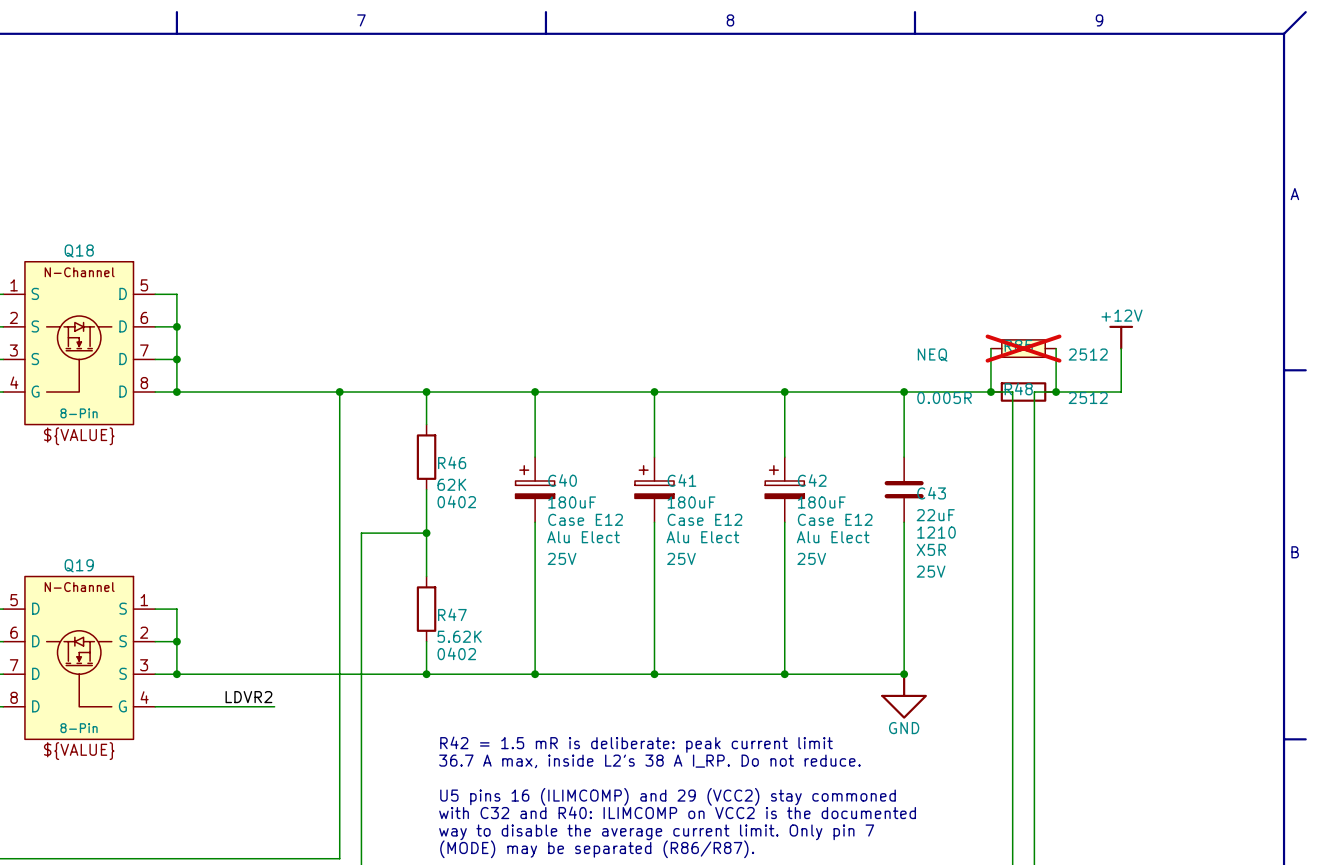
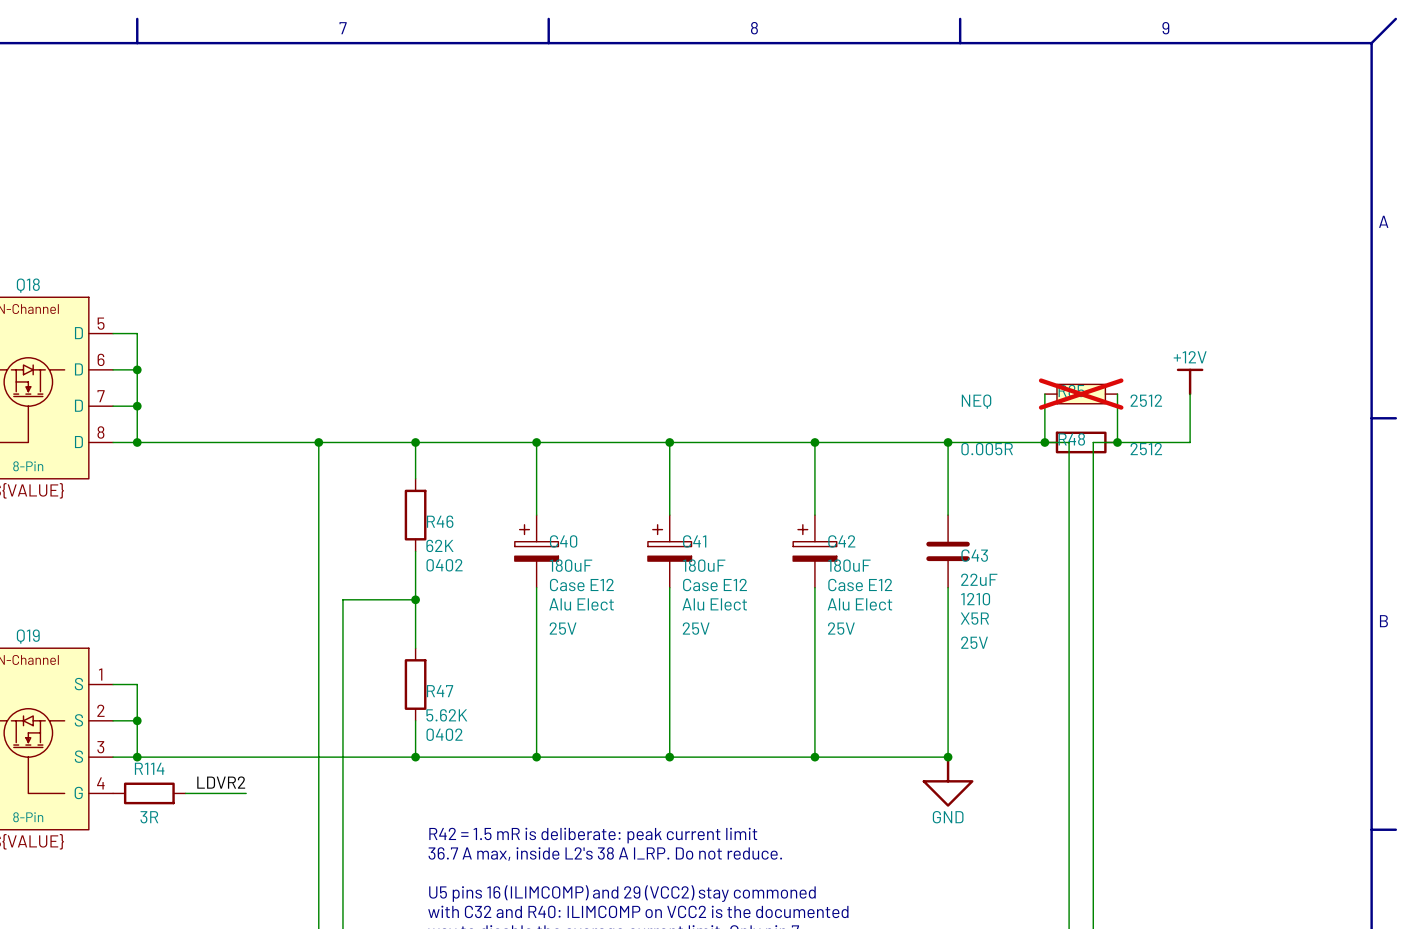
wire: (155, 706) (220, 706) -> none
R114: none -> 3R (149, 793)

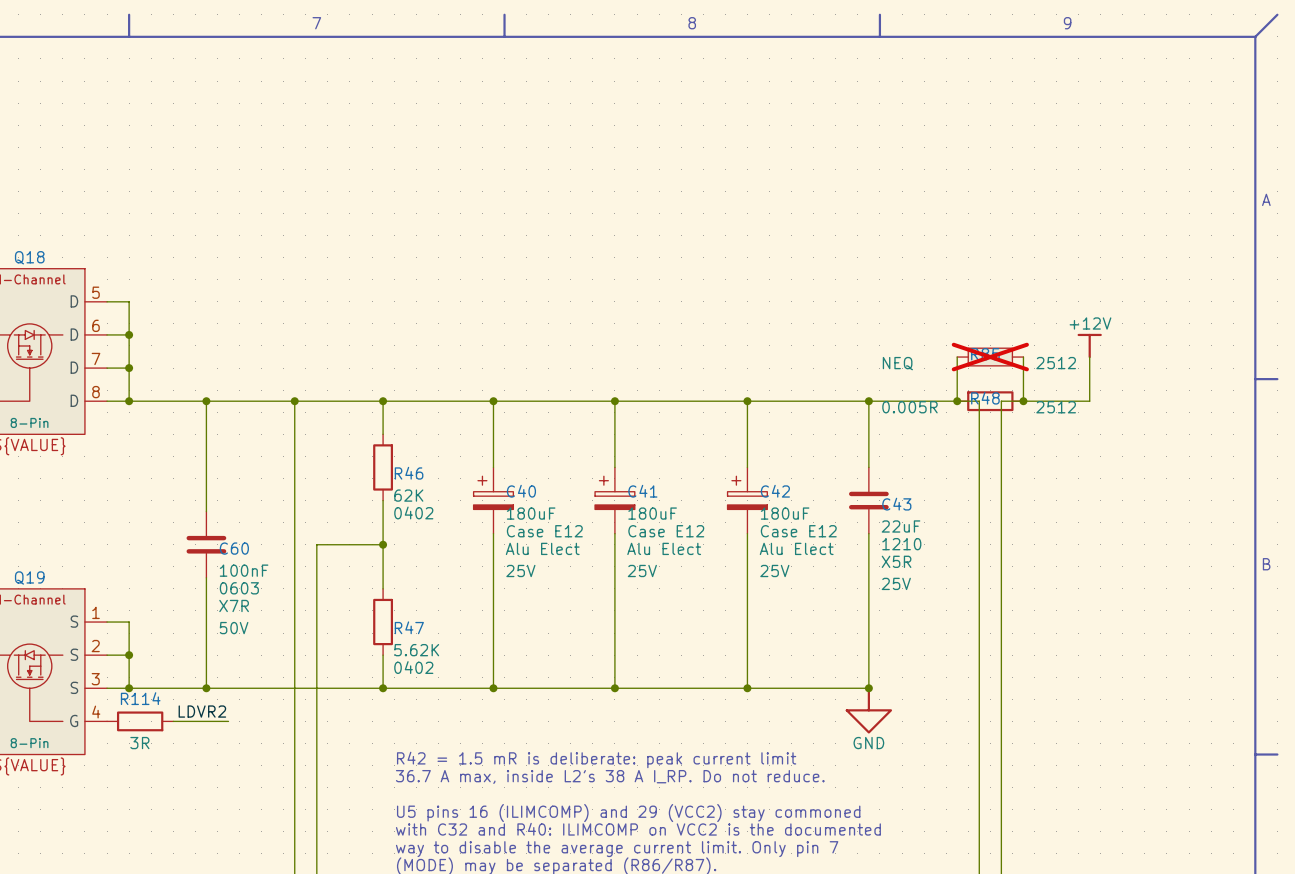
wire: none -> (206, 401) (206, 511)
junction: none -> (206, 401)
C60: none -> 100nF (206, 544)
wire: none -> (206, 577) (206, 688)
junction: none -> (206, 688)

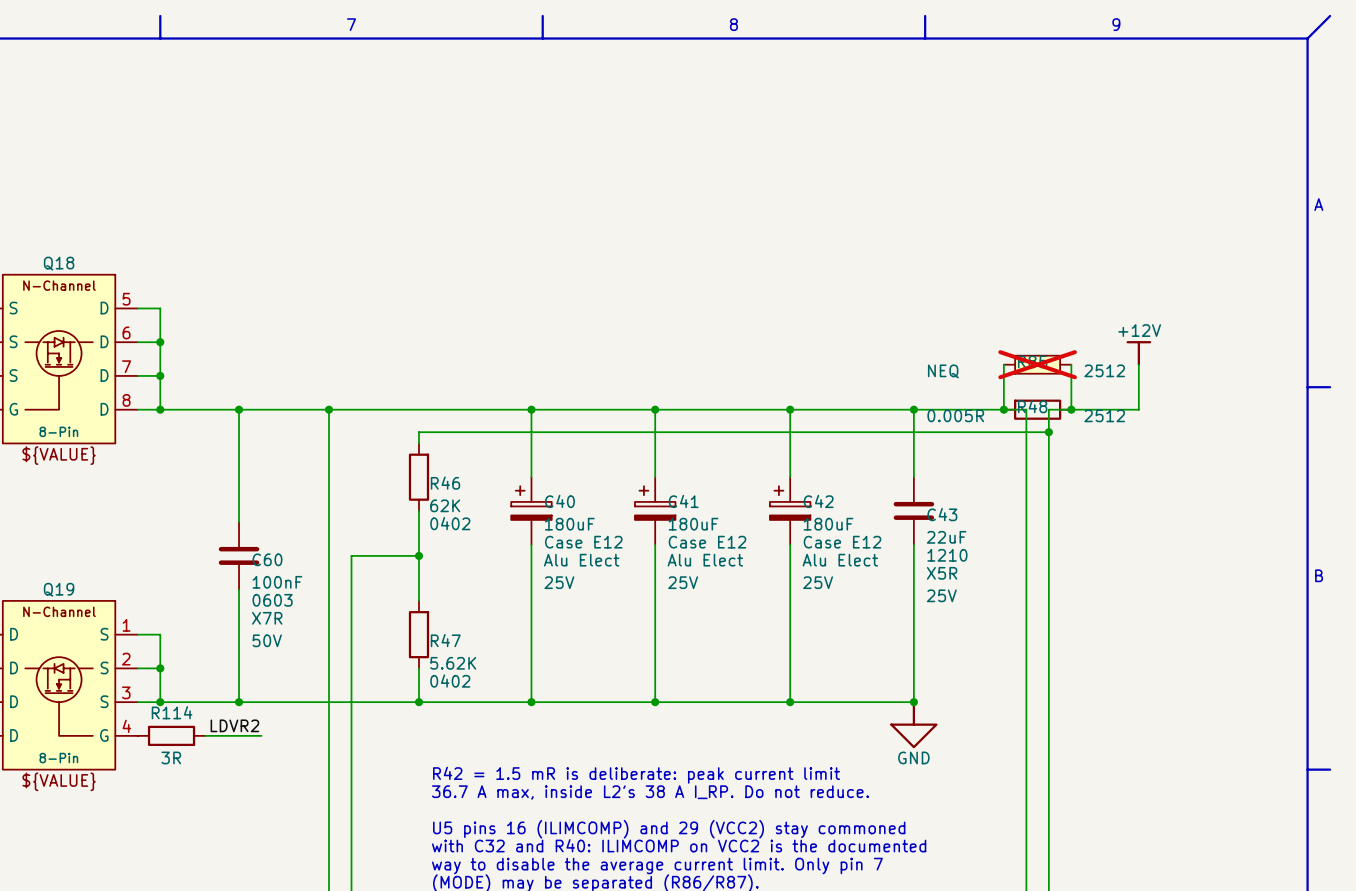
wire: (383, 401) (383, 423) -> (1048, 432) (418, 432)
junction: (383, 401) -> none
junction: none -> (1048, 432)

